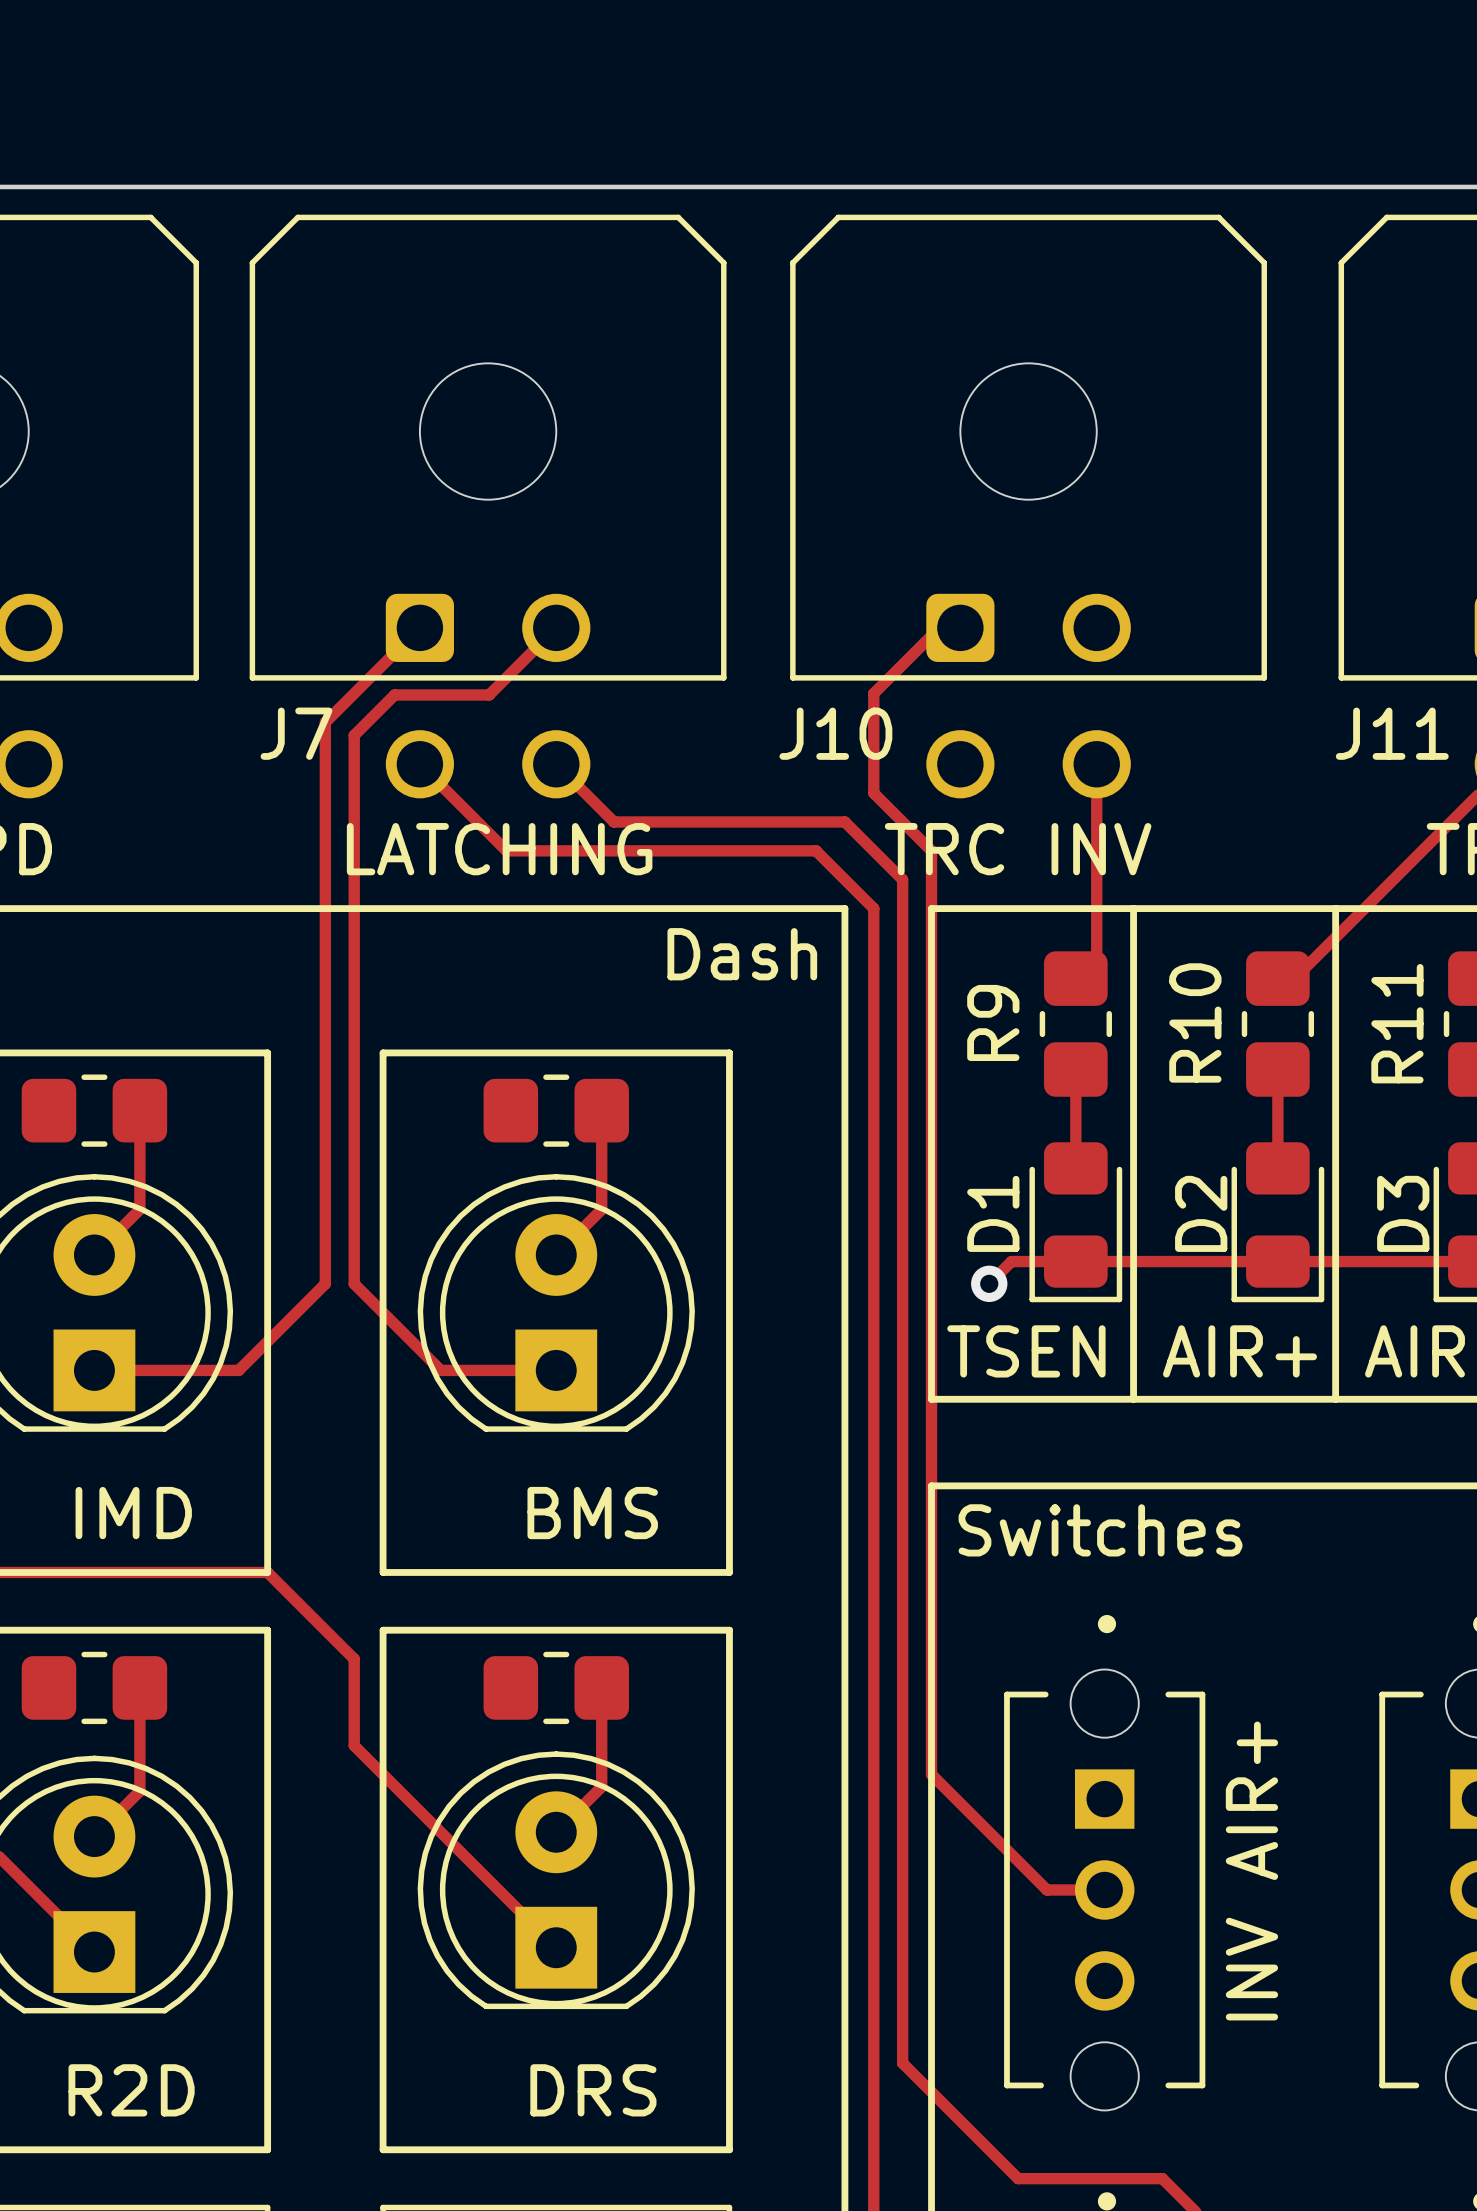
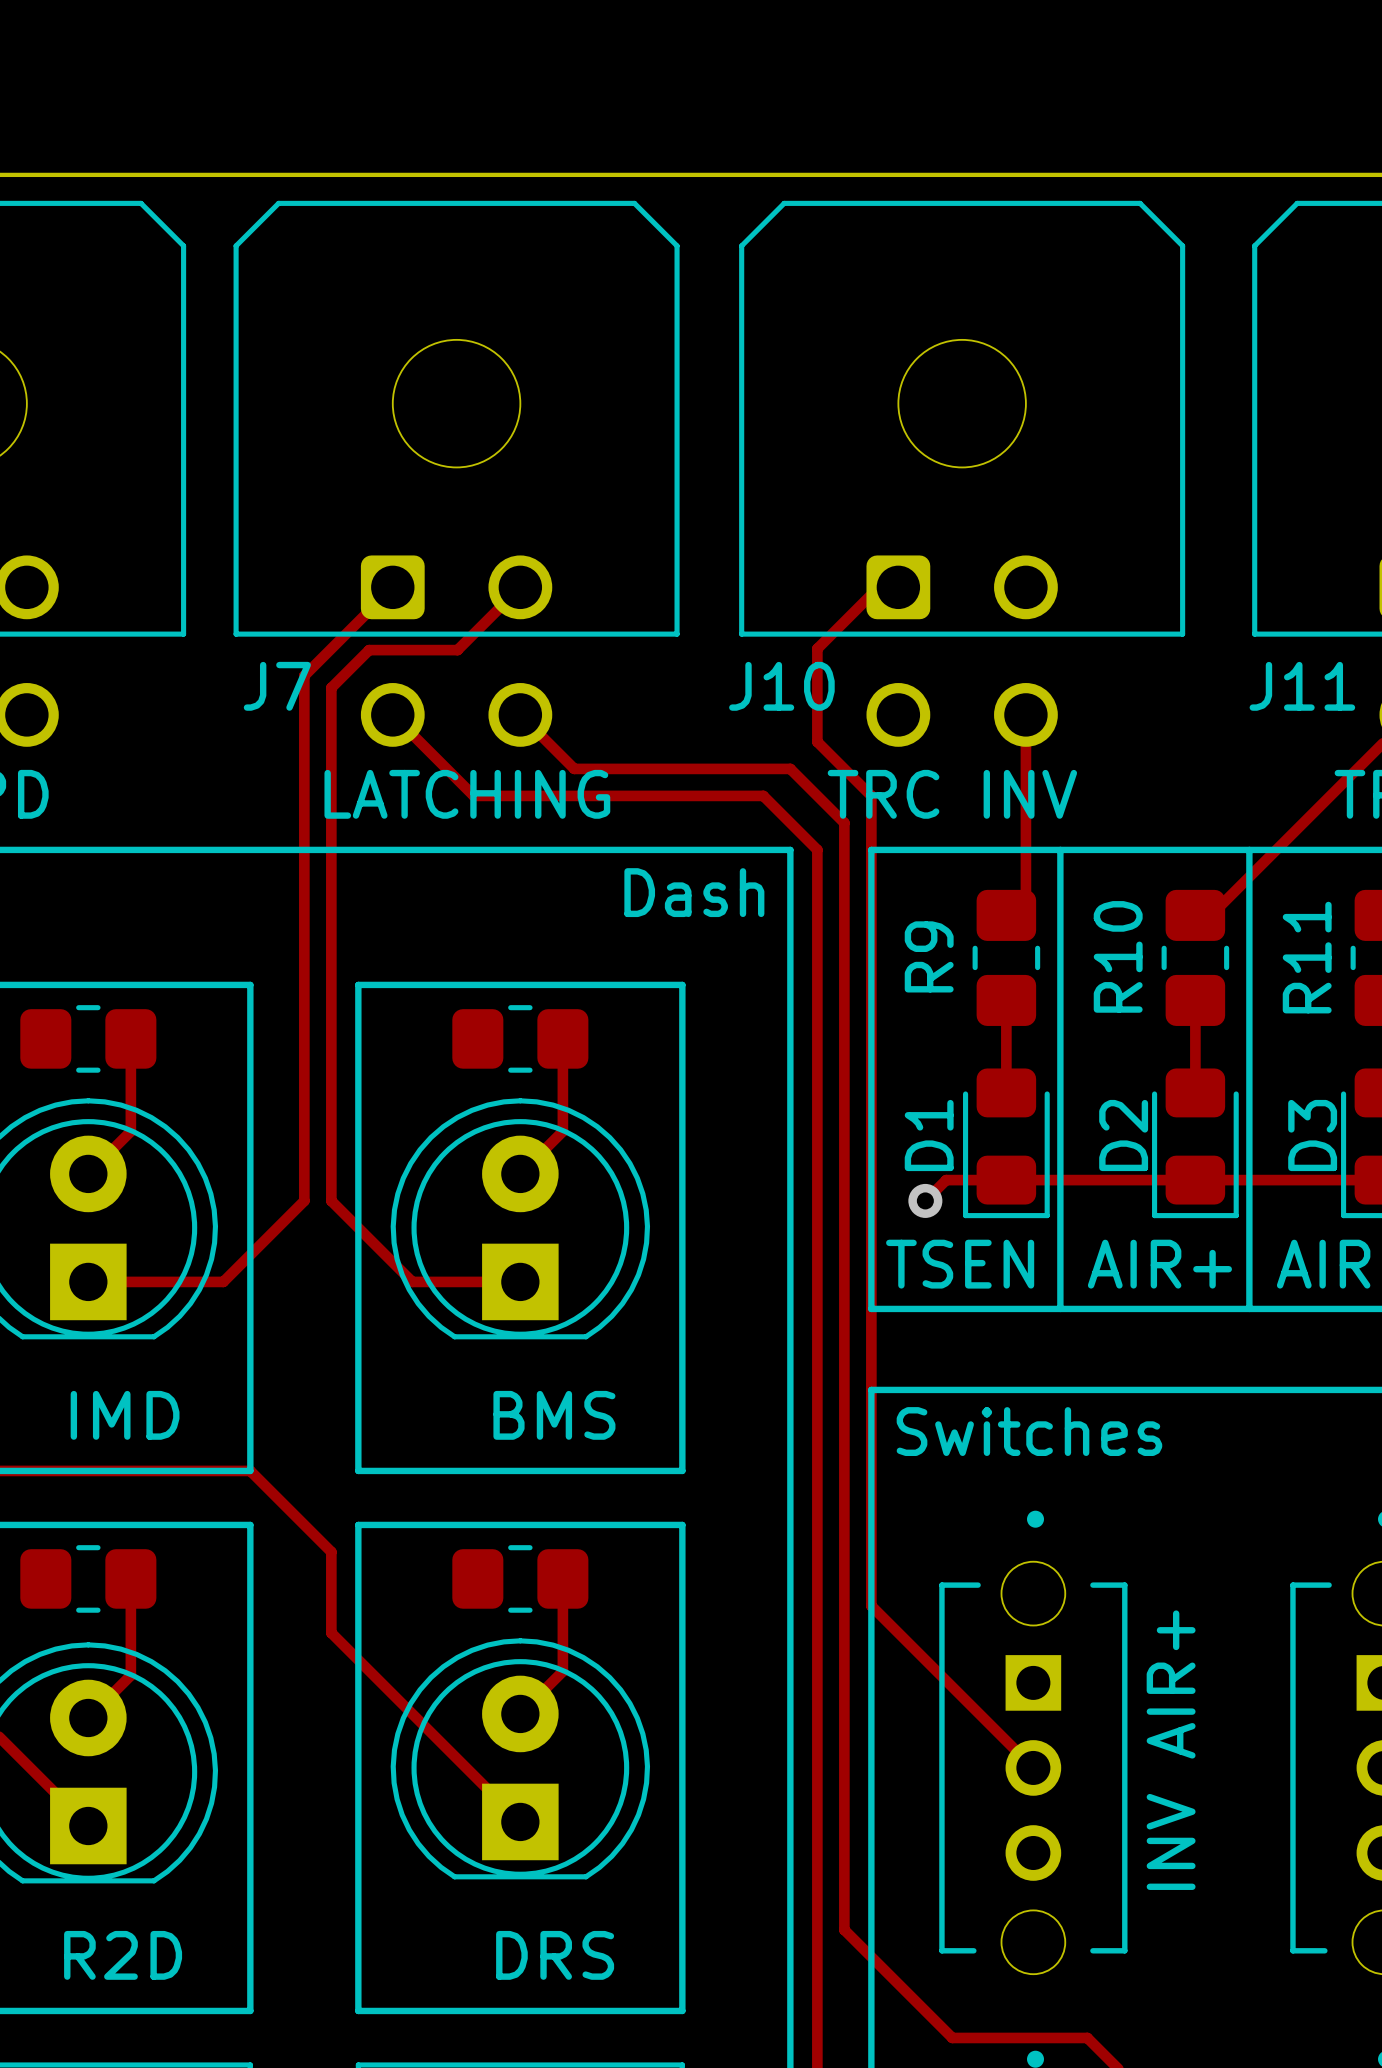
track: (931, 1716) (931, 1774) (1046, 1889) (1104, 1889) -> (871, 1605) (1033, 1767)

